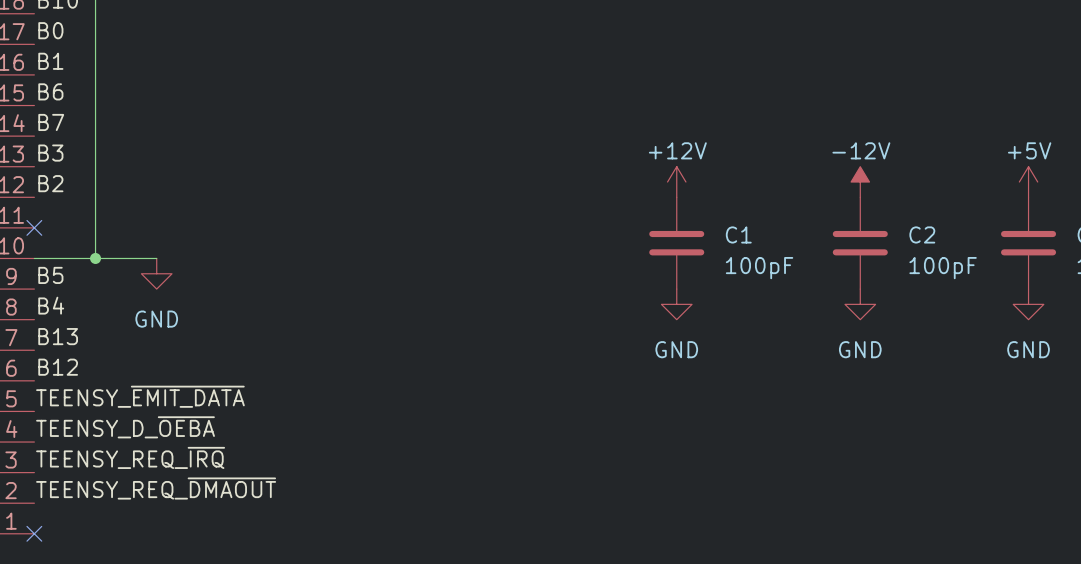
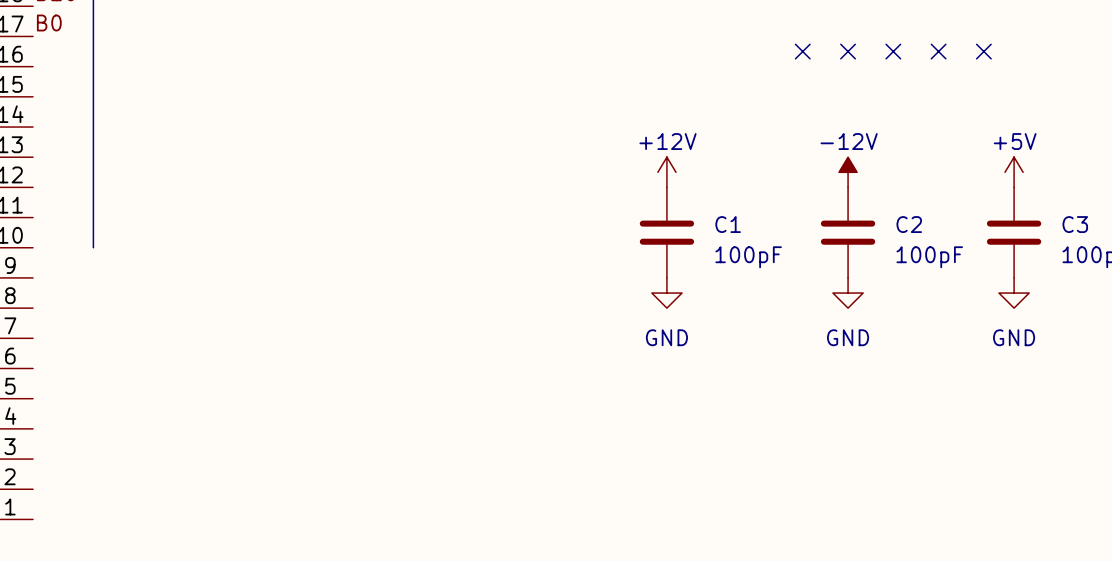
no-connect mark: none -> (802, 51)
no-connect mark: none -> (848, 51)
no-connect mark: none -> (893, 51)
no-connect mark: none -> (938, 51)
no-connect mark: none -> (983, 51)
label: B1 (50, 61) -> none
label: B6 (50, 91) -> none
label: B7 (51, 122) -> none
label: B3 (50, 153) -> none
label: B2 (50, 183) -> none
no-connect mark: (34, 227) -> none
wire: (34, 258) (156, 258) -> none
junction: (95, 258) -> none
power symbol: GND (156, 273) -> none
label: B5 (50, 275) -> none
label: B4 (51, 305) -> none
label: B13 (58, 336) -> none
label: B12 (58, 367) -> none
label: TEENSY_~{EMIT_DATA} (140, 396) -> none
label: TEENSY_D_~{OEBA} (125, 427) -> none
label: TEENSY_REQ_~{IRQ} (130, 457) -> none
label: TEENSY_REQ_~{DMAOUT} (156, 488) -> none
no-connect mark: (34, 533) -> none

